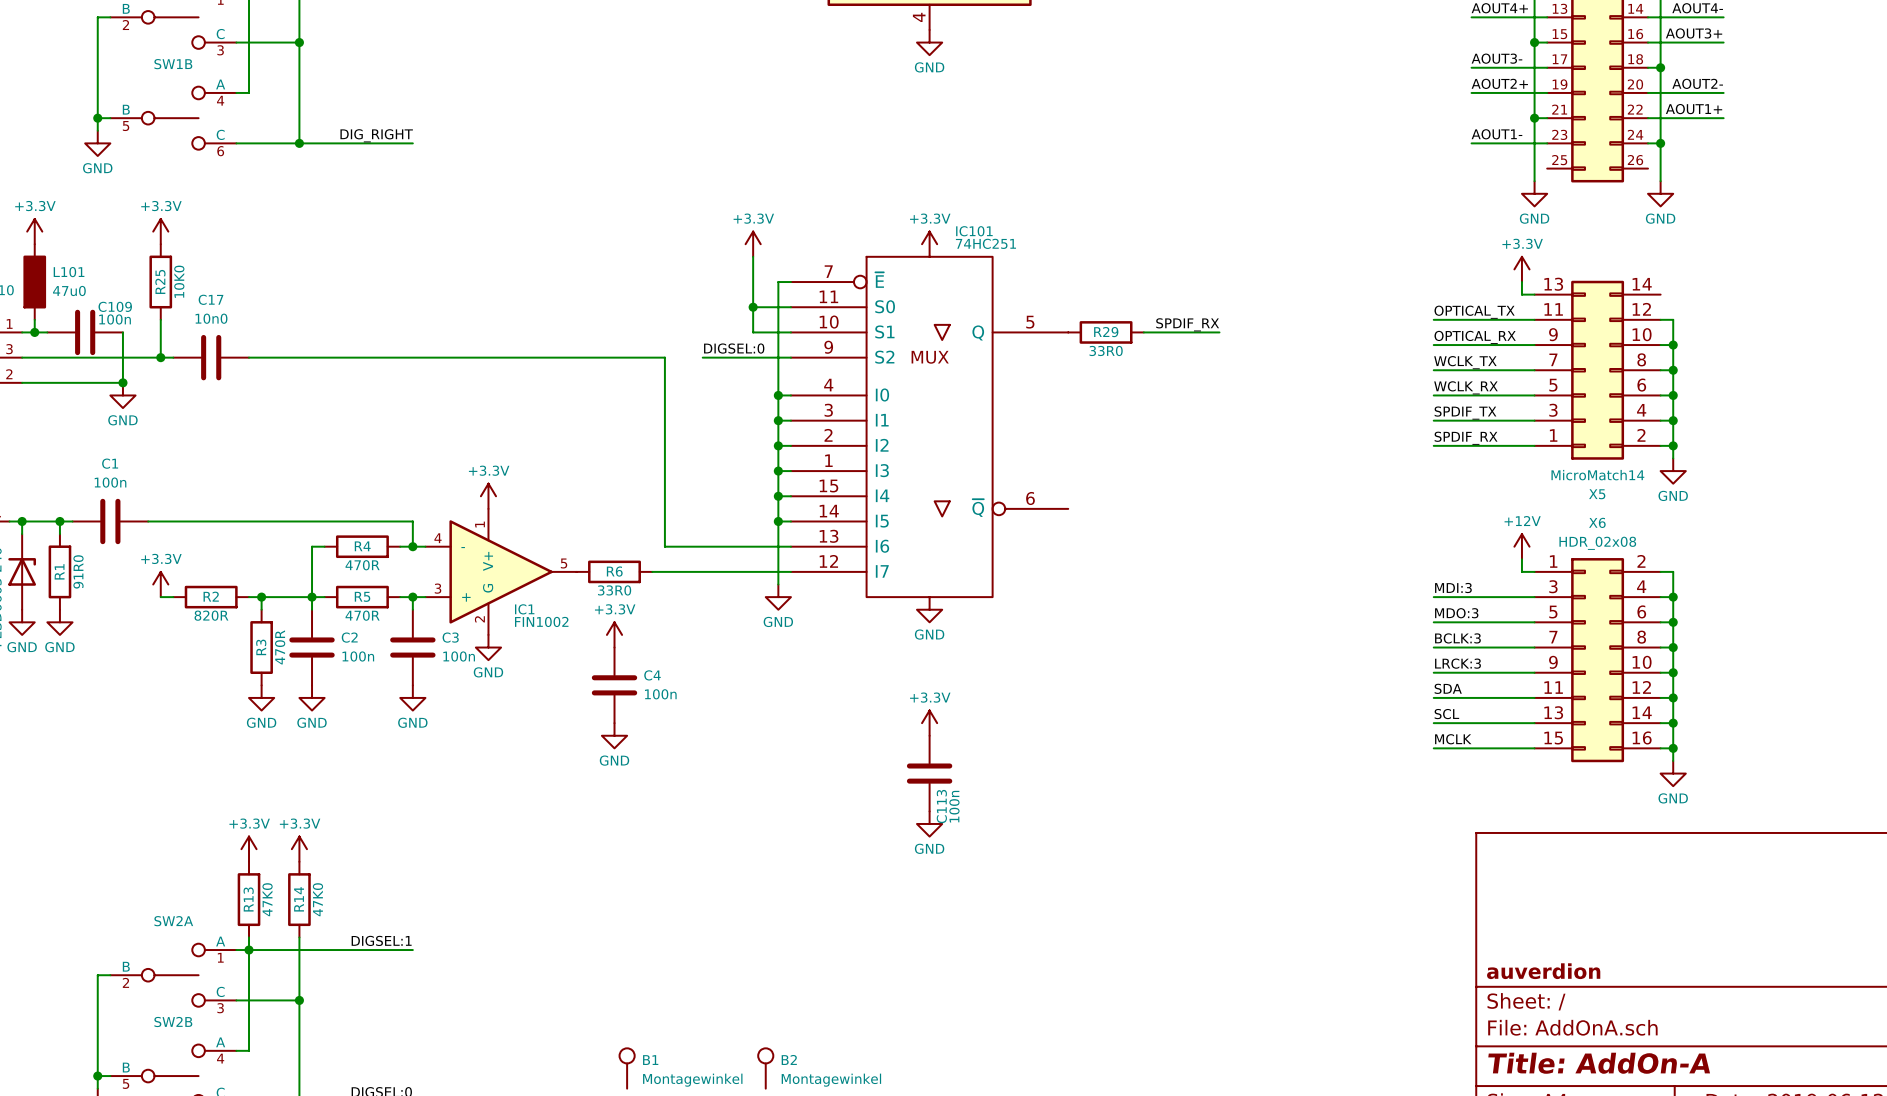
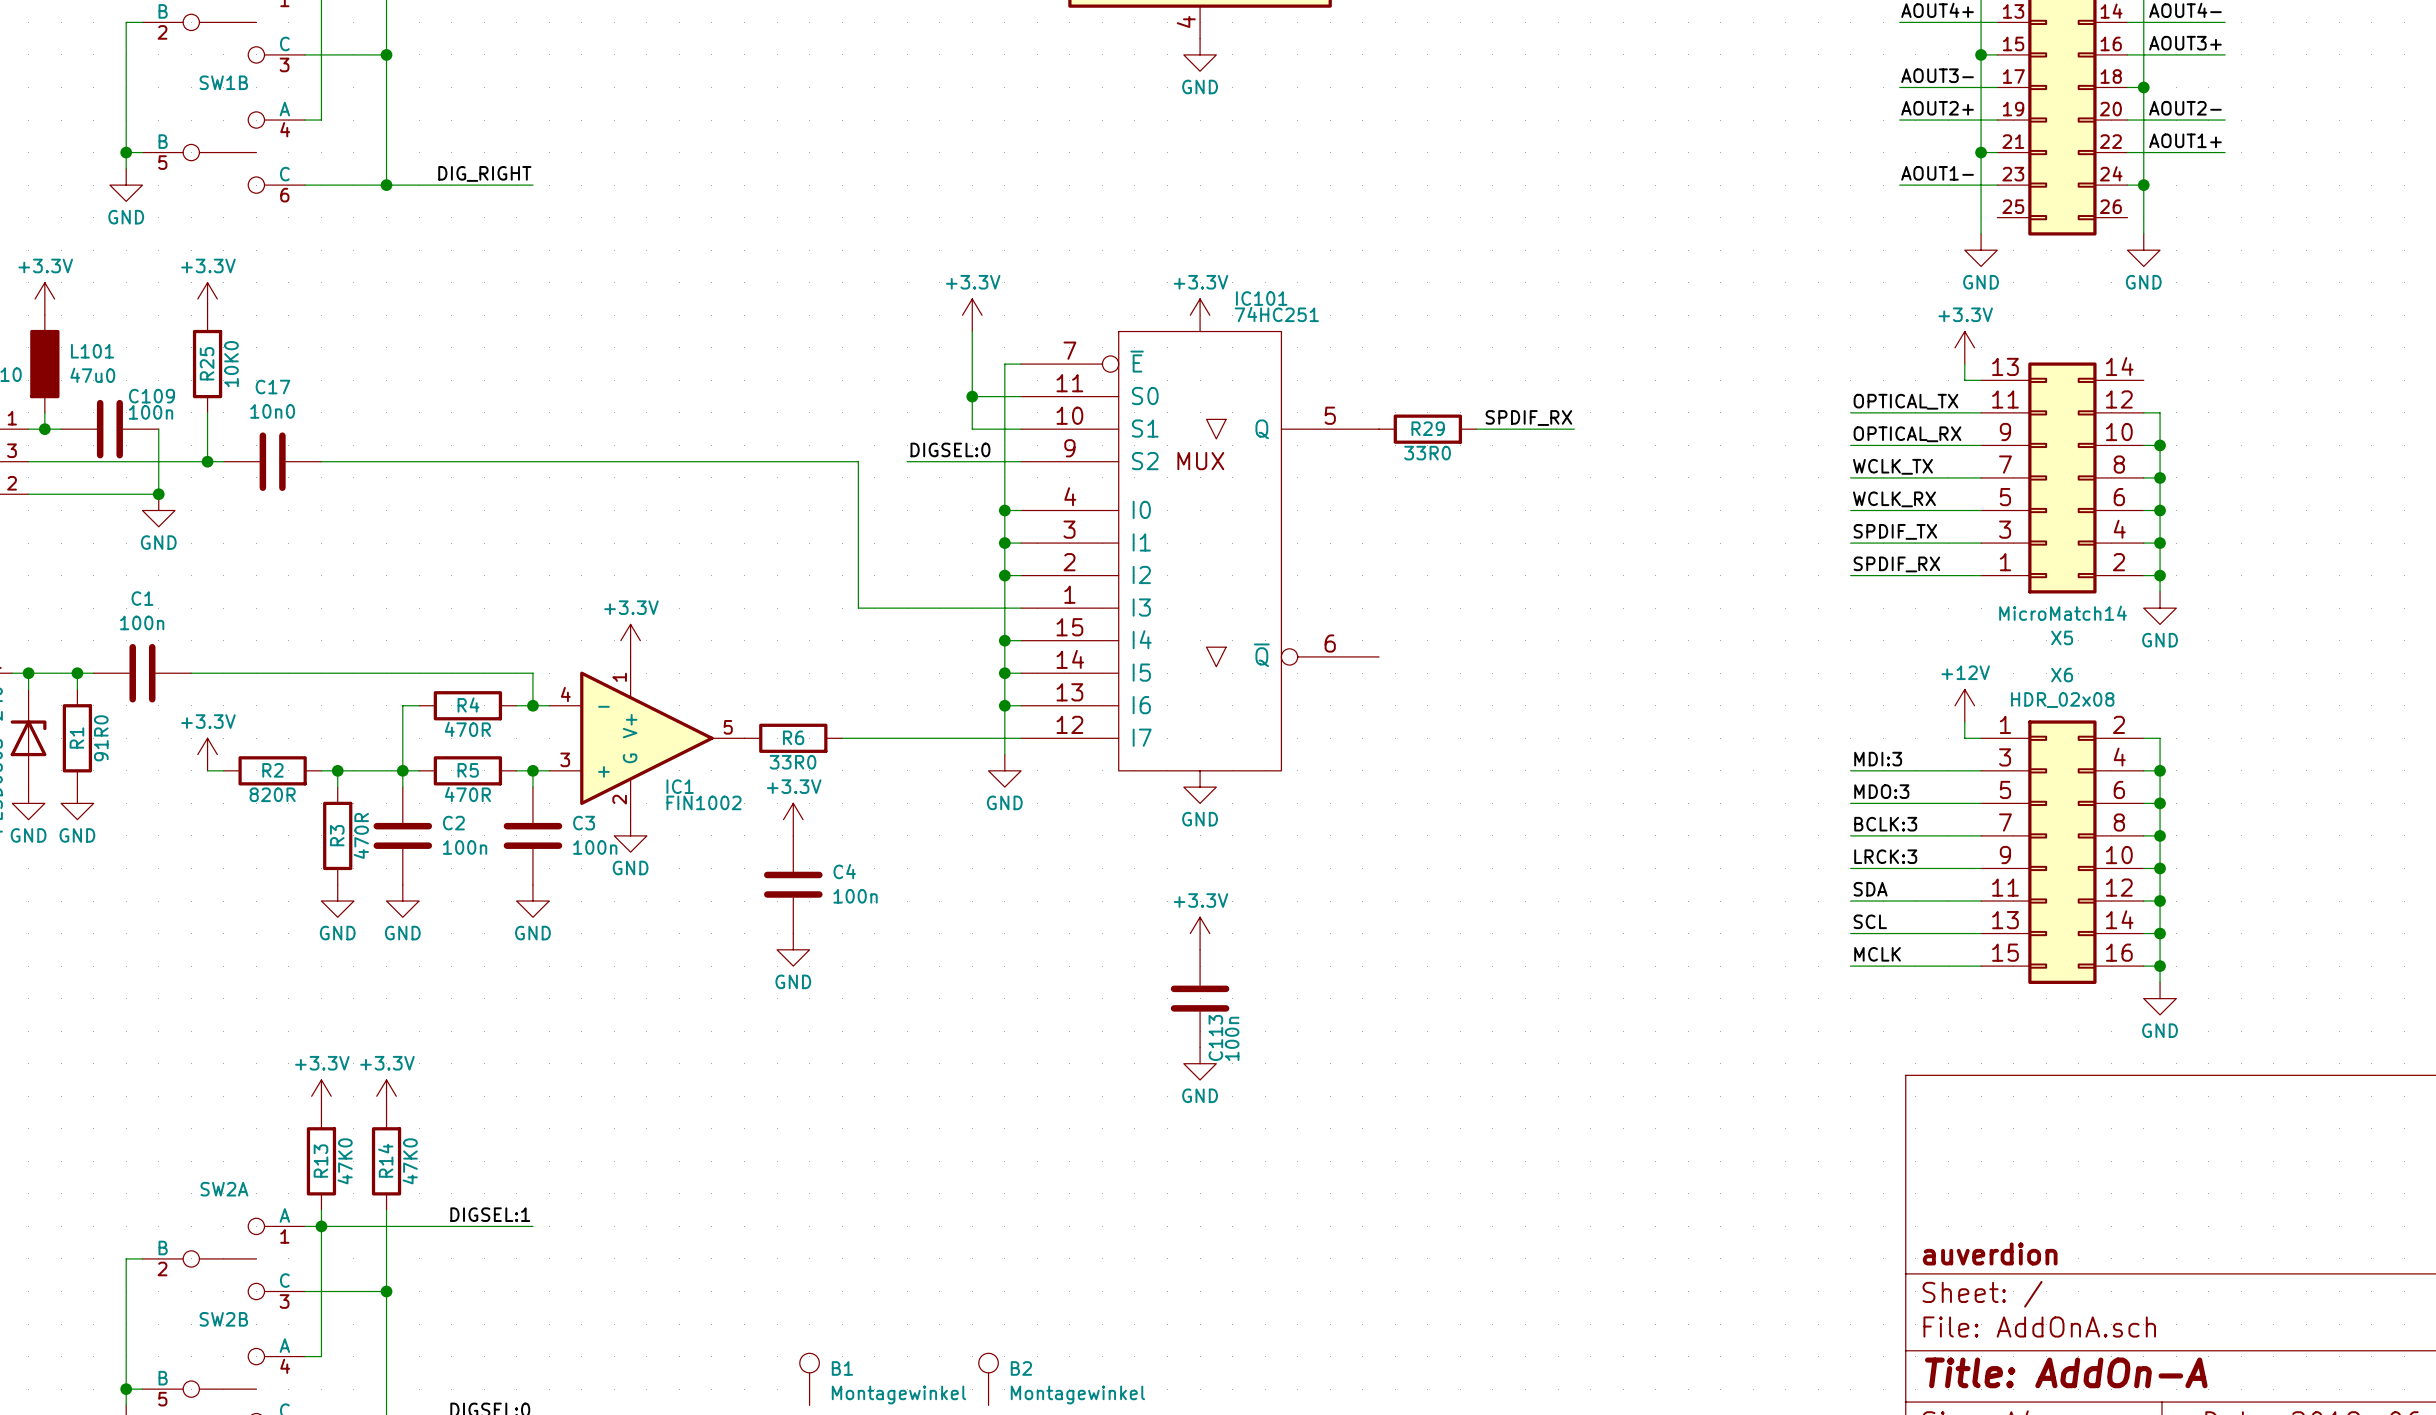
wire: (664, 471) (664, 546) (778, 546) -> (858, 608) (1004, 608)
junction: (778, 471) -> none
junction: none -> (1004, 705)

